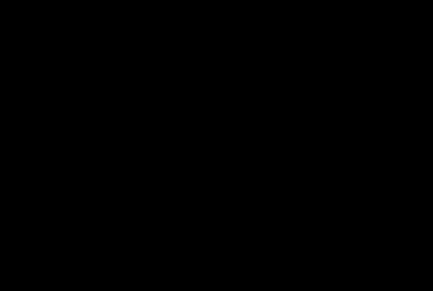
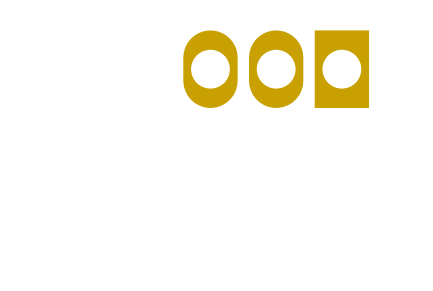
part: none -> (276, 69)

